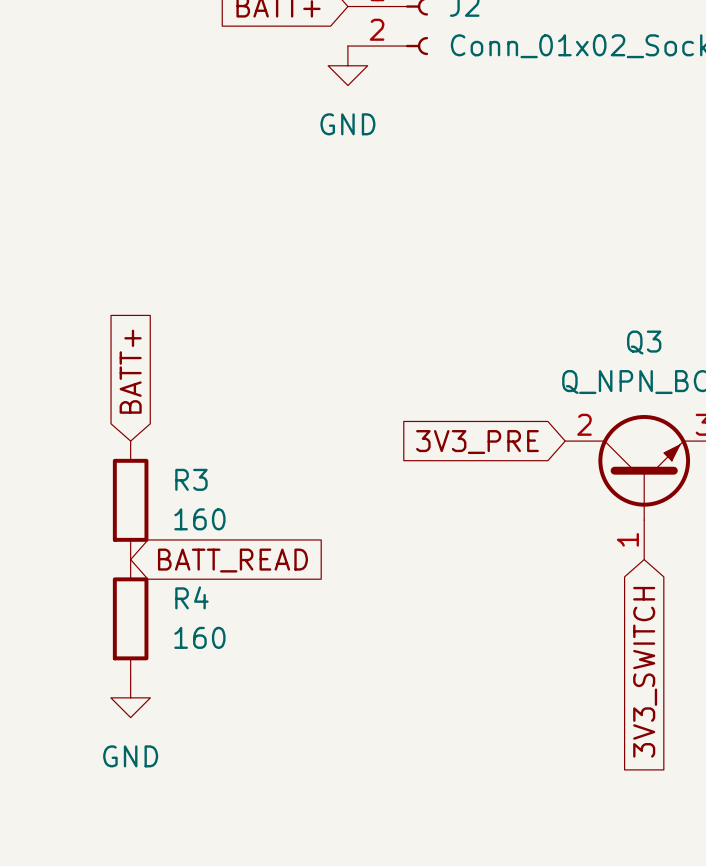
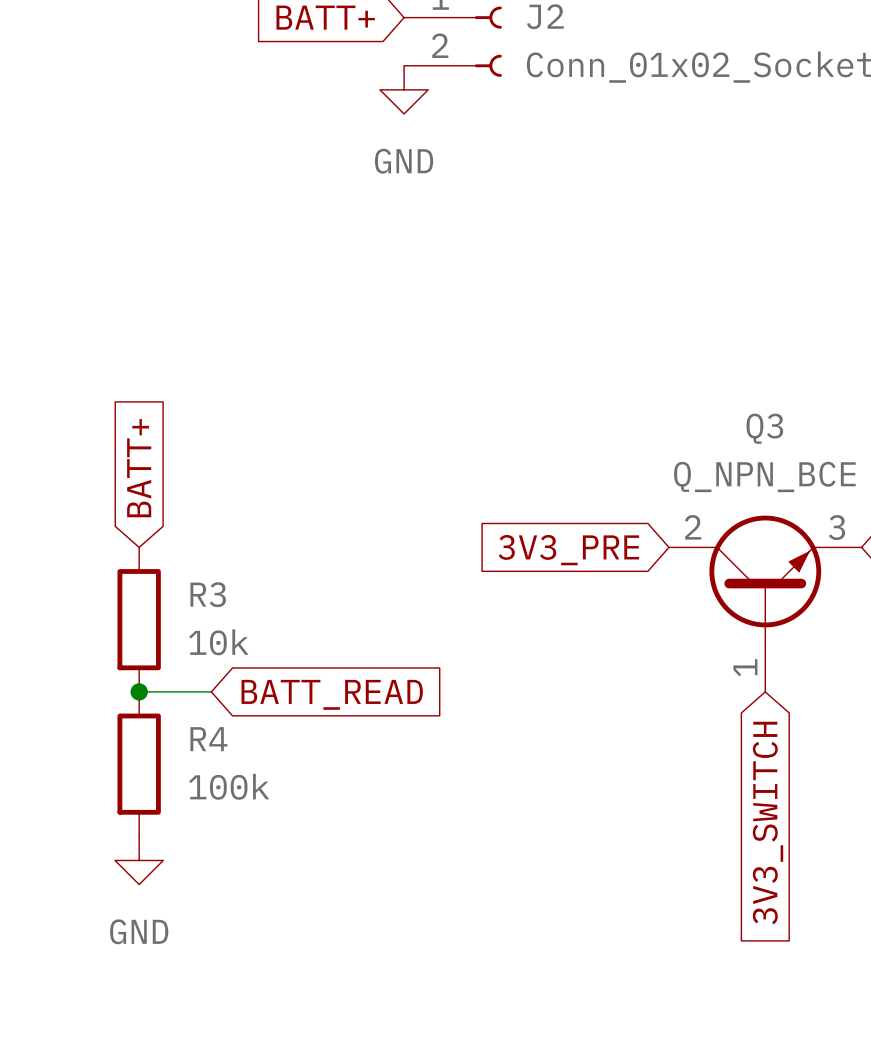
R3 value: 160 (199, 519) -> 10k (218, 642)
wire: none -> (139, 691) (211, 691)
junction: none -> (139, 691)
global label position: BATT_READ (232, 560) -> BATT_READ (332, 694)
R4 value: 160 (199, 637) -> 100k (229, 786)

